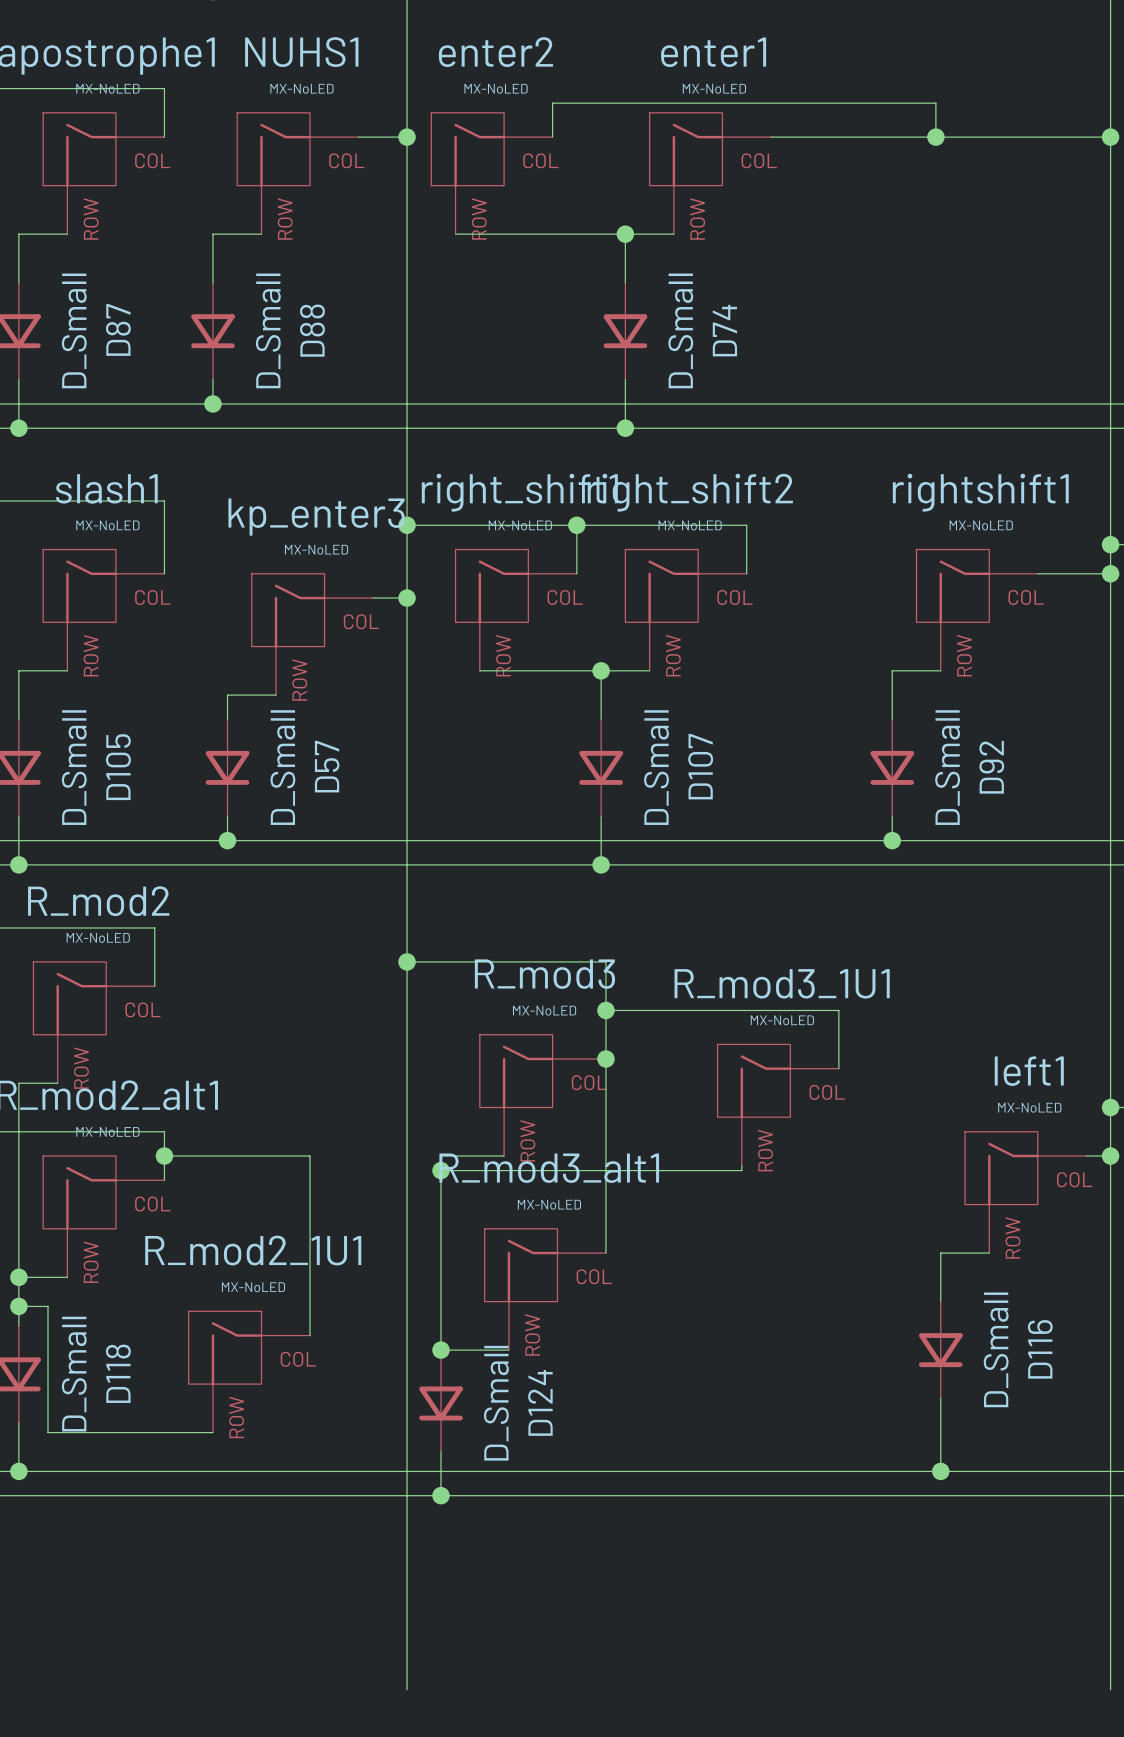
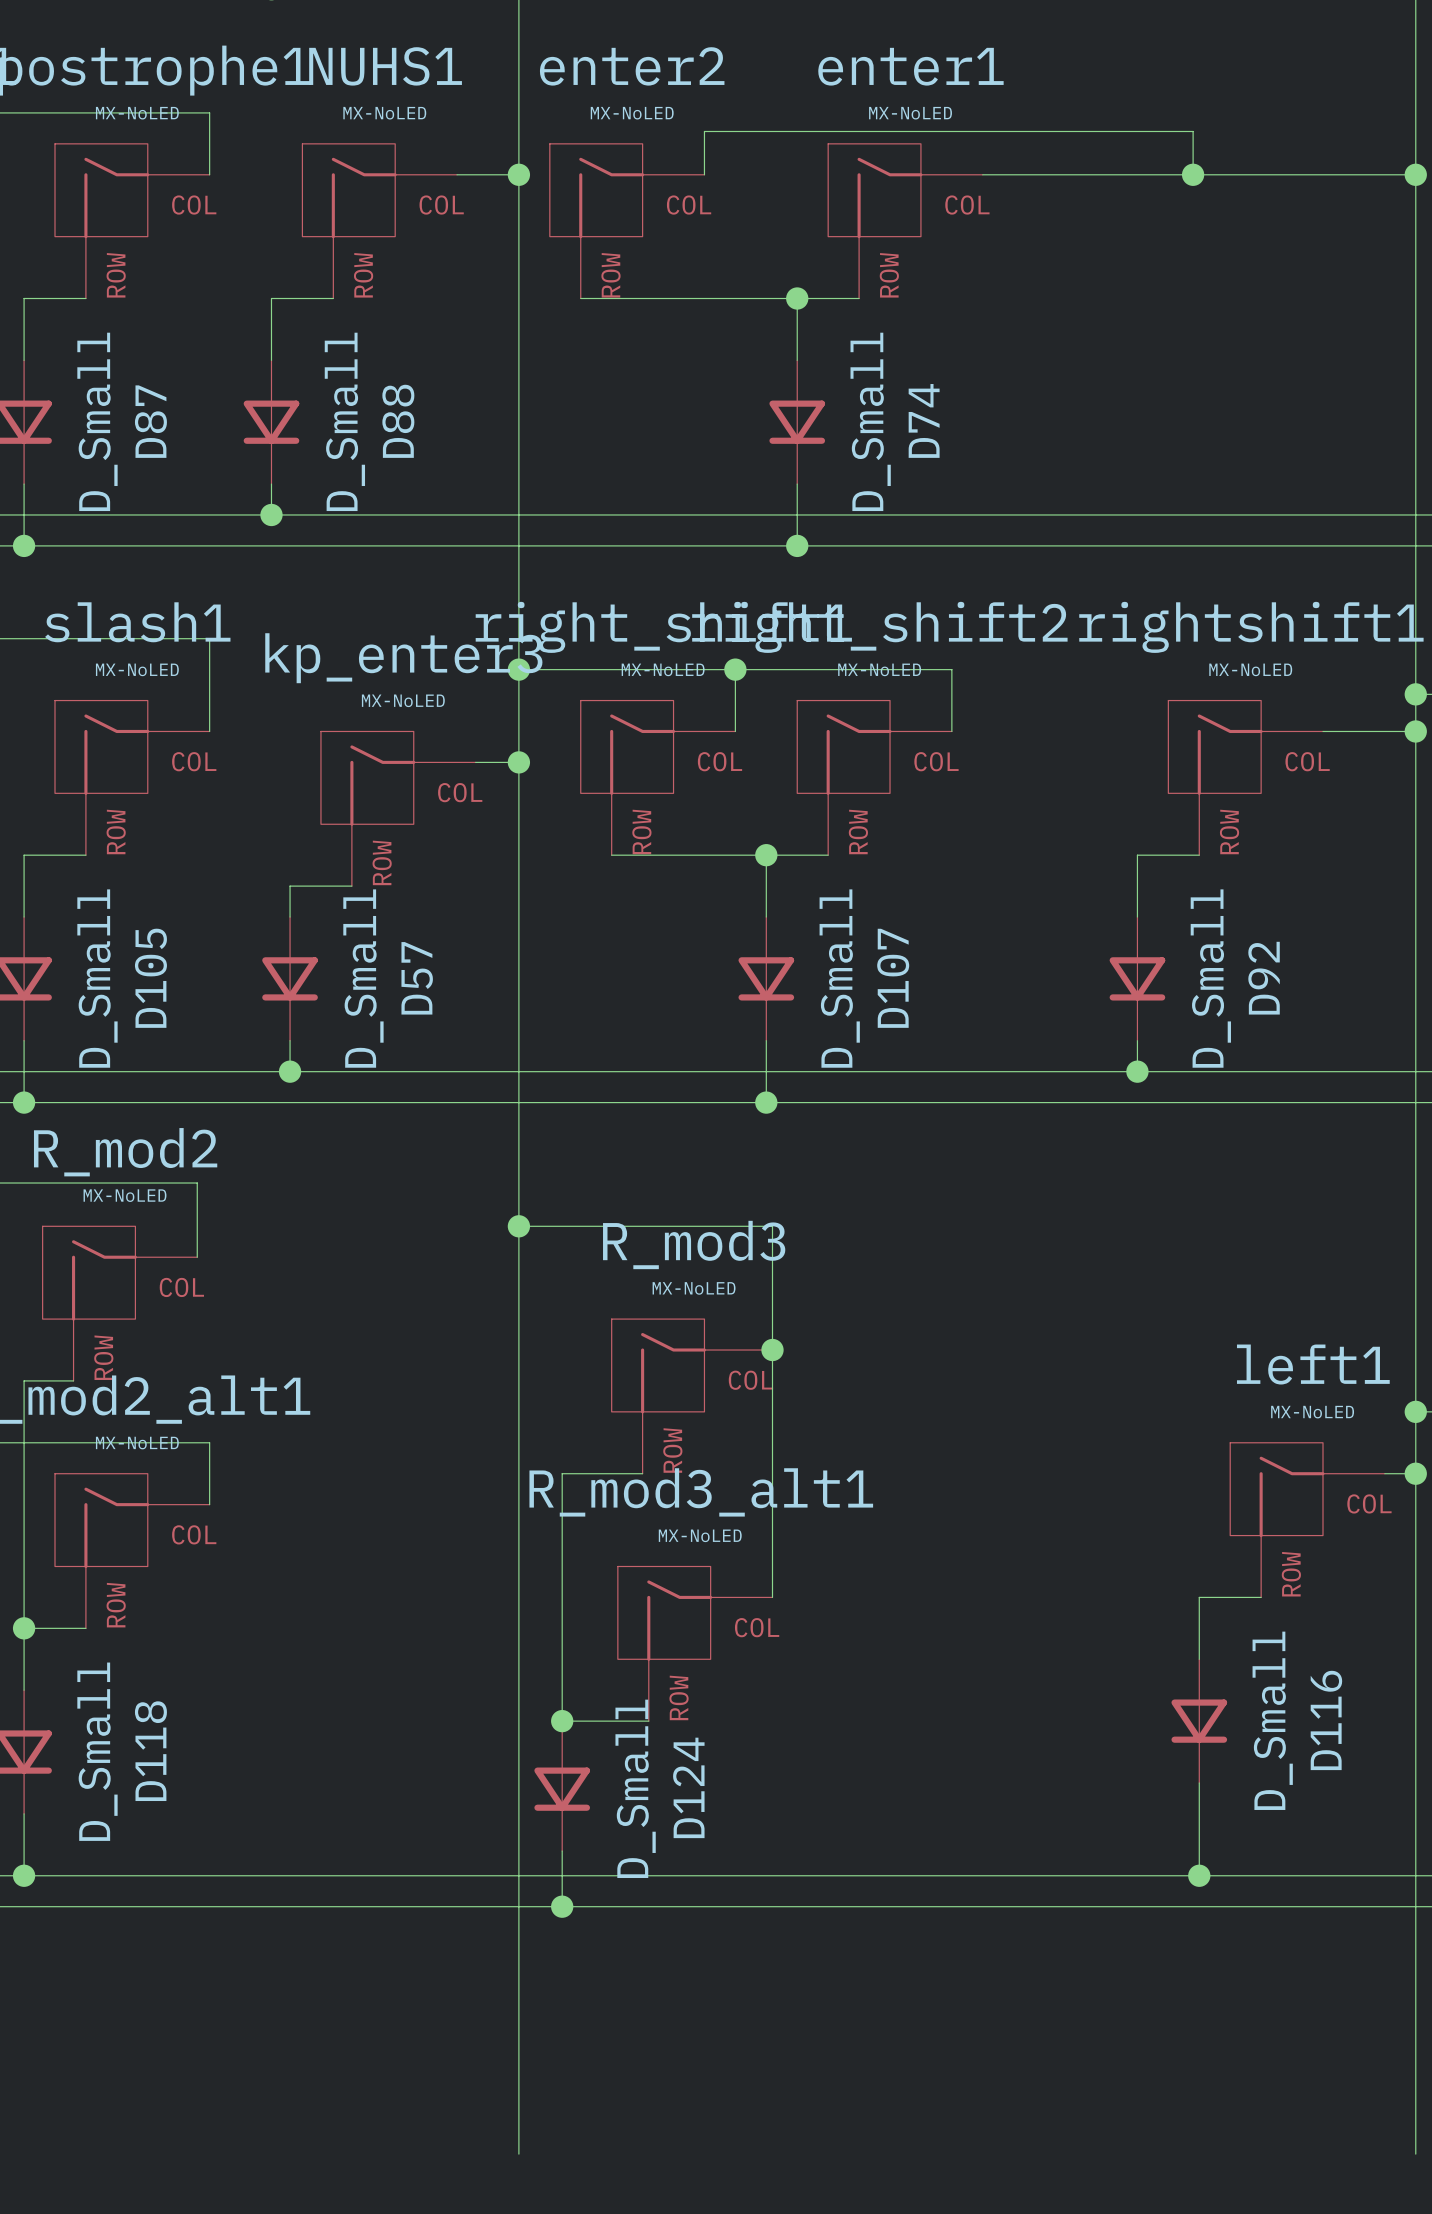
wire: (605, 1010) (838, 1010) (838, 1068) -> none
junction: (605, 1010) -> none
R_mod3_1U1: MX-NoLED (778, 1105) -> none
wire: (164, 1156) (310, 1156) (310, 1335) -> none
junction: (164, 1156) -> none
wire: (741, 1165) (741, 1170) (441, 1170) -> none
junction: (441, 1170) -> none
wire: (18, 1306) (47, 1306) (47, 1432) (212, 1432) -> none
junction: (18, 1306) -> none
R_mod2_1U1: MX-NoLED (249, 1371) -> none

